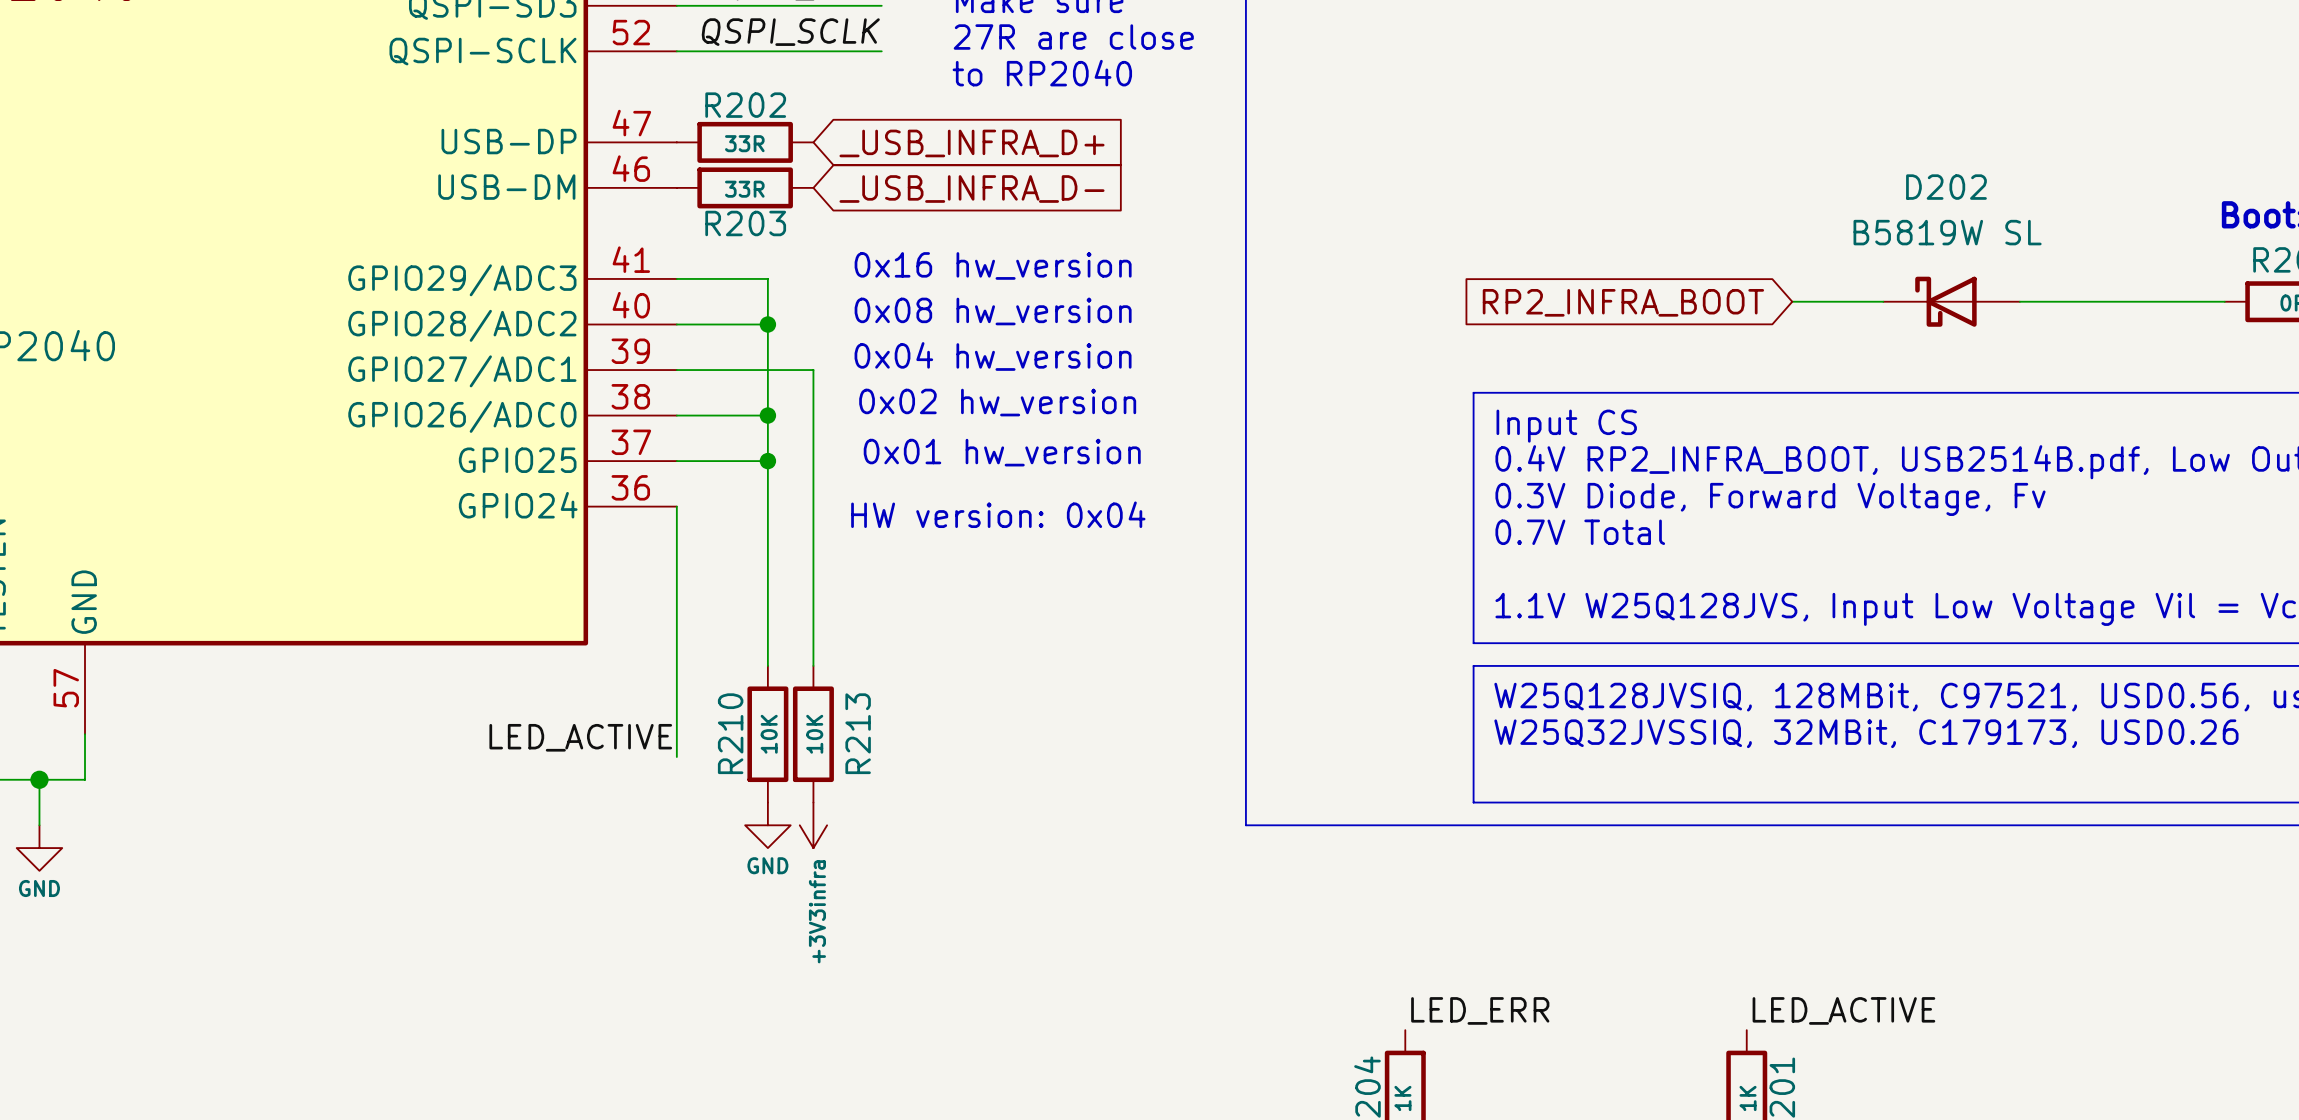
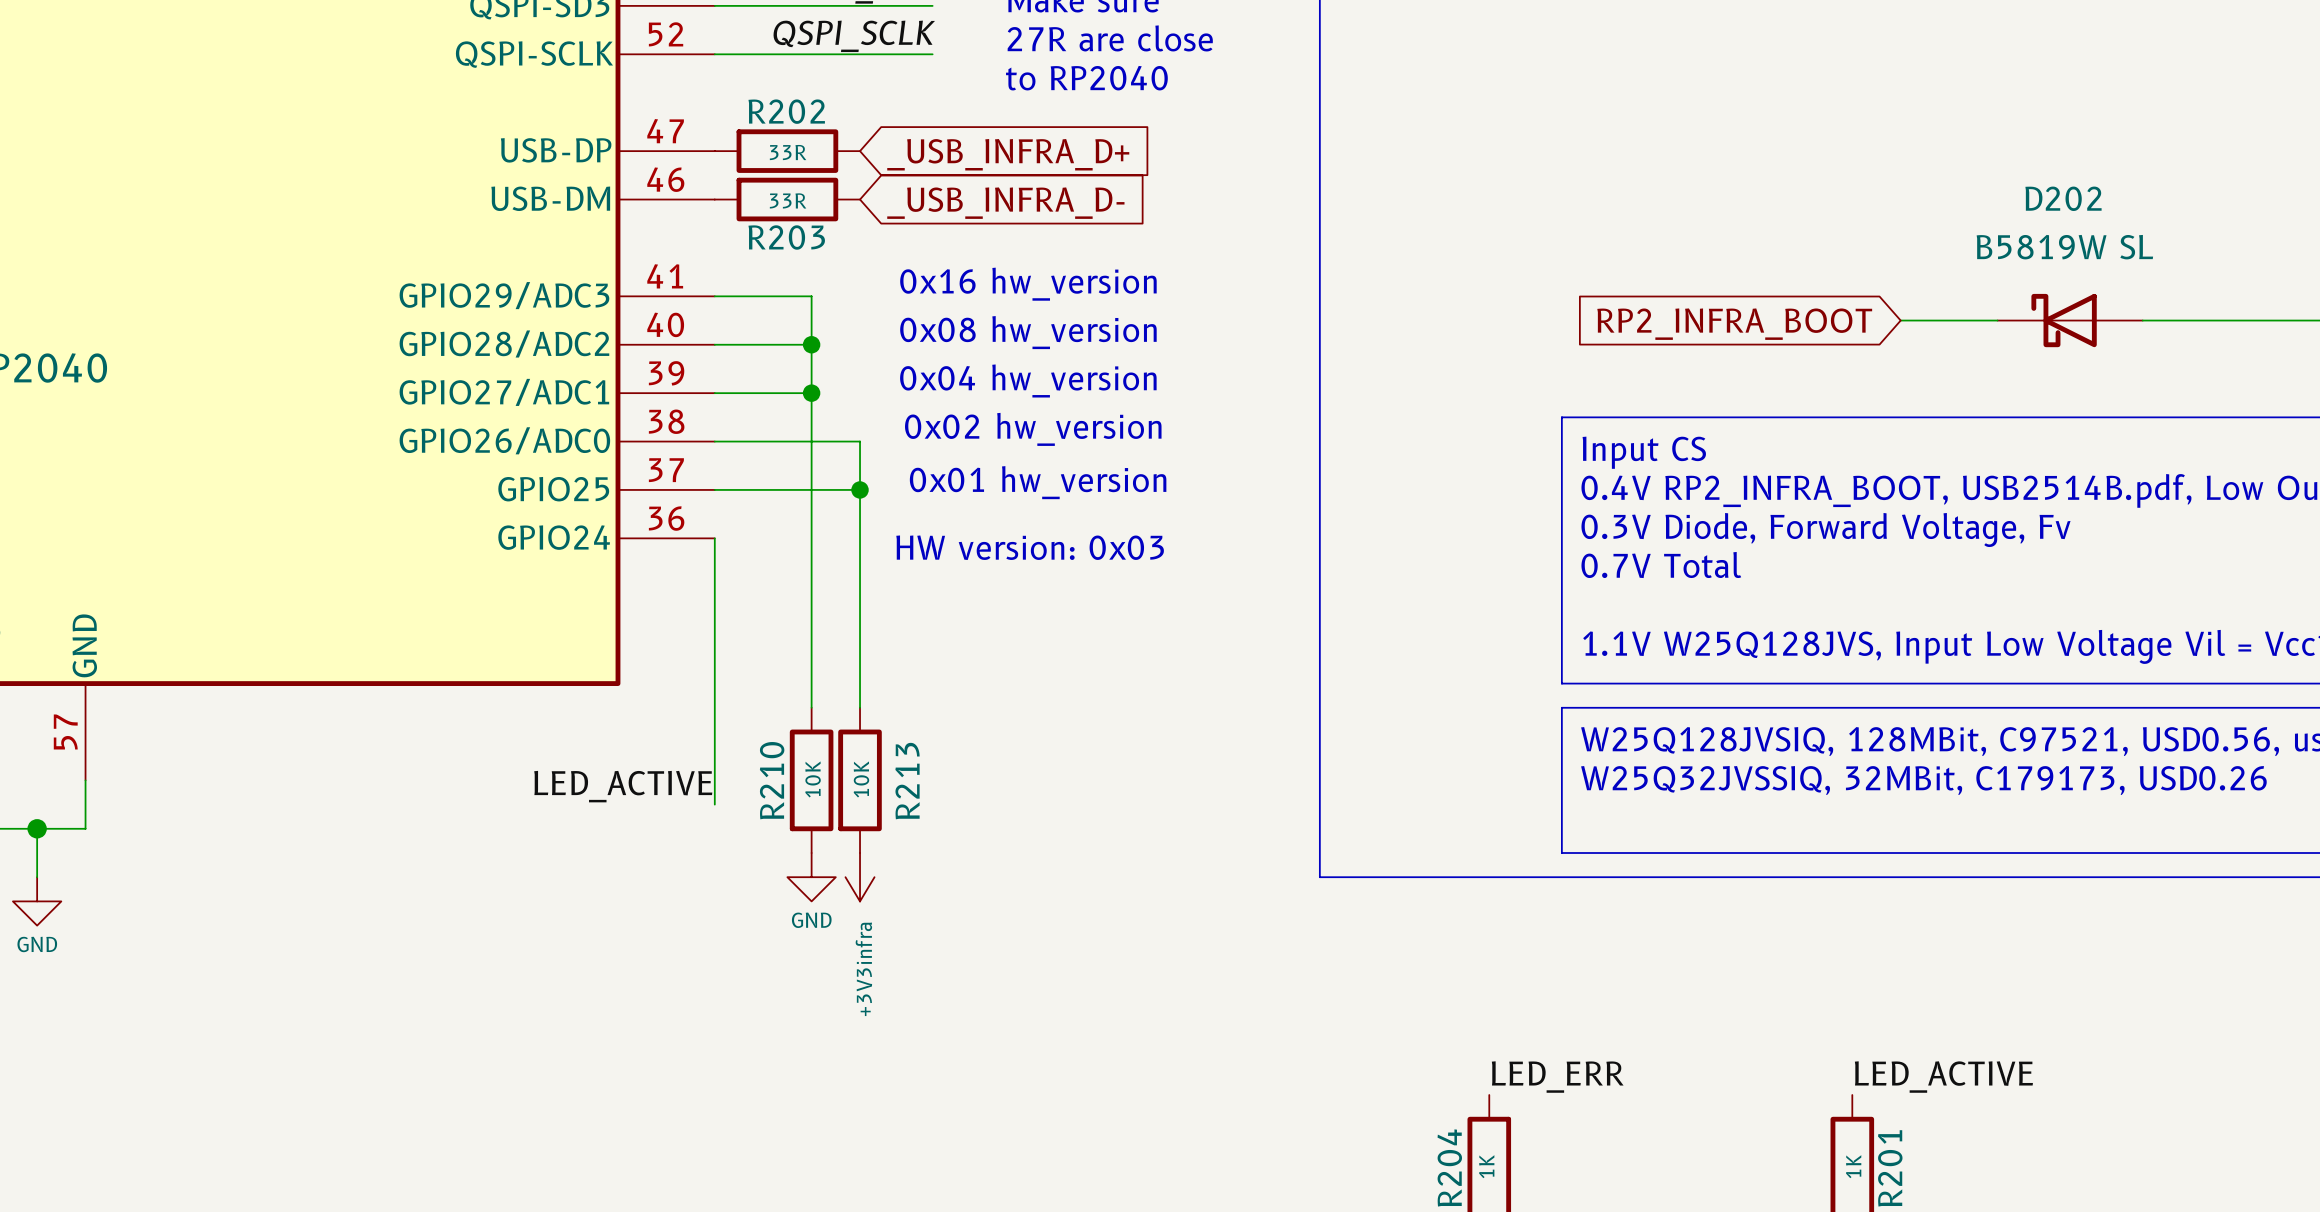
wire: (767, 370) (813, 370) (813, 415) -> (811, 441) (860, 441)
junction: none -> (811, 393)
junction: (767, 415) -> none
wire: none -> (811, 489) (860, 489)
junction: (767, 461) -> none
junction: none -> (860, 489)
text: HW version: 0x04 (998, 514) -> HW version: 0x03 (1030, 547)

